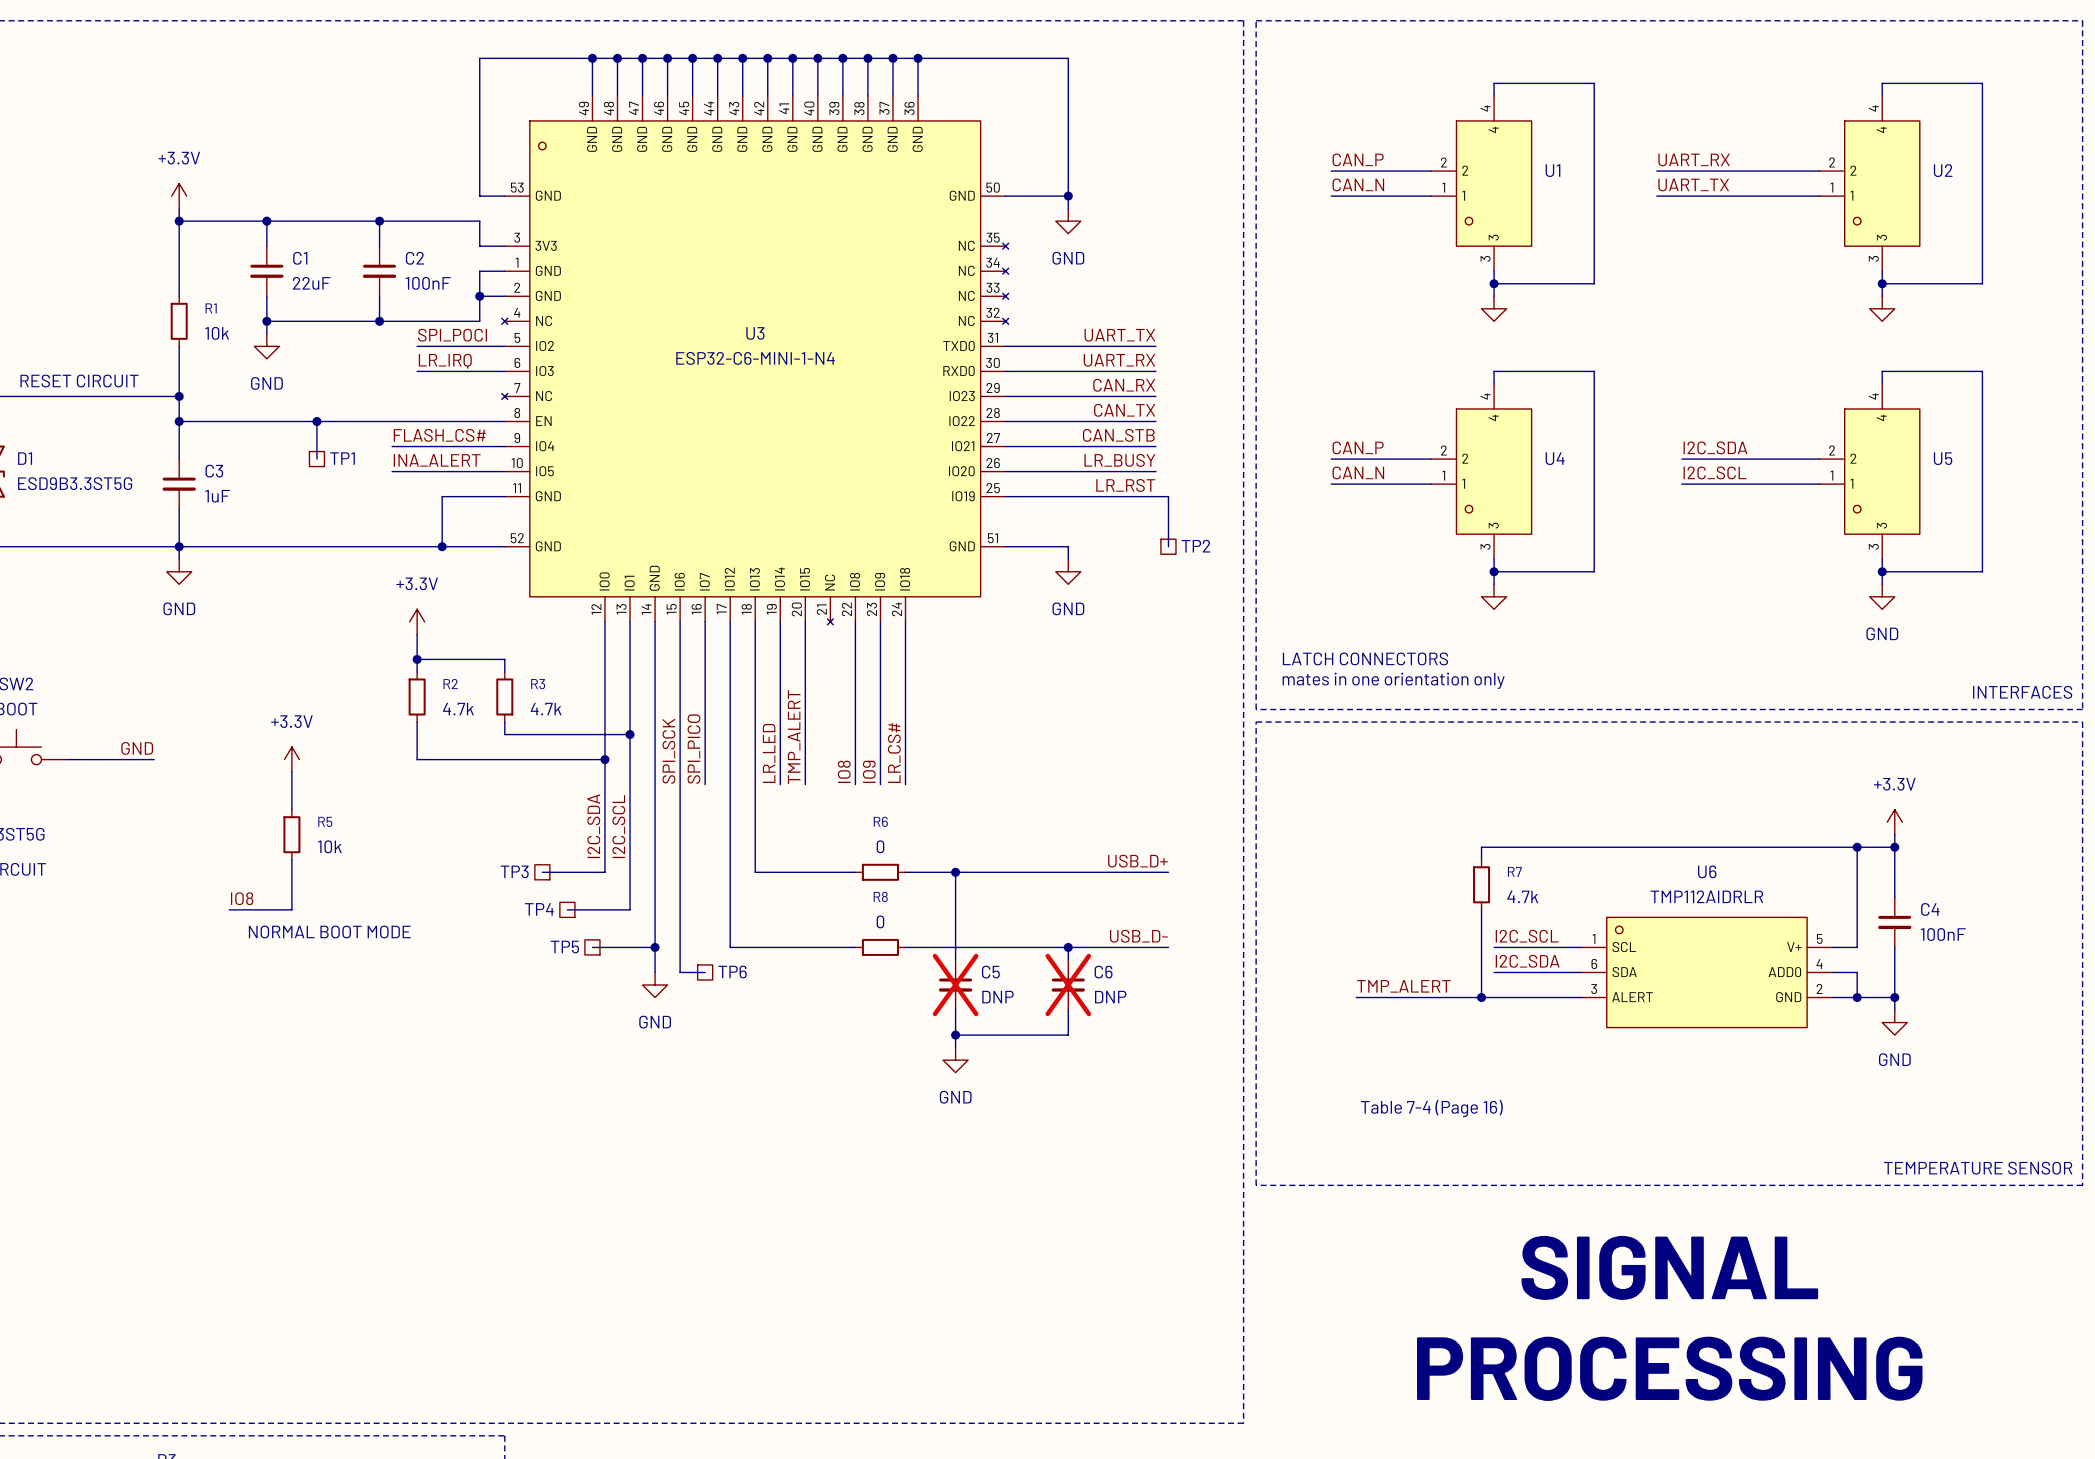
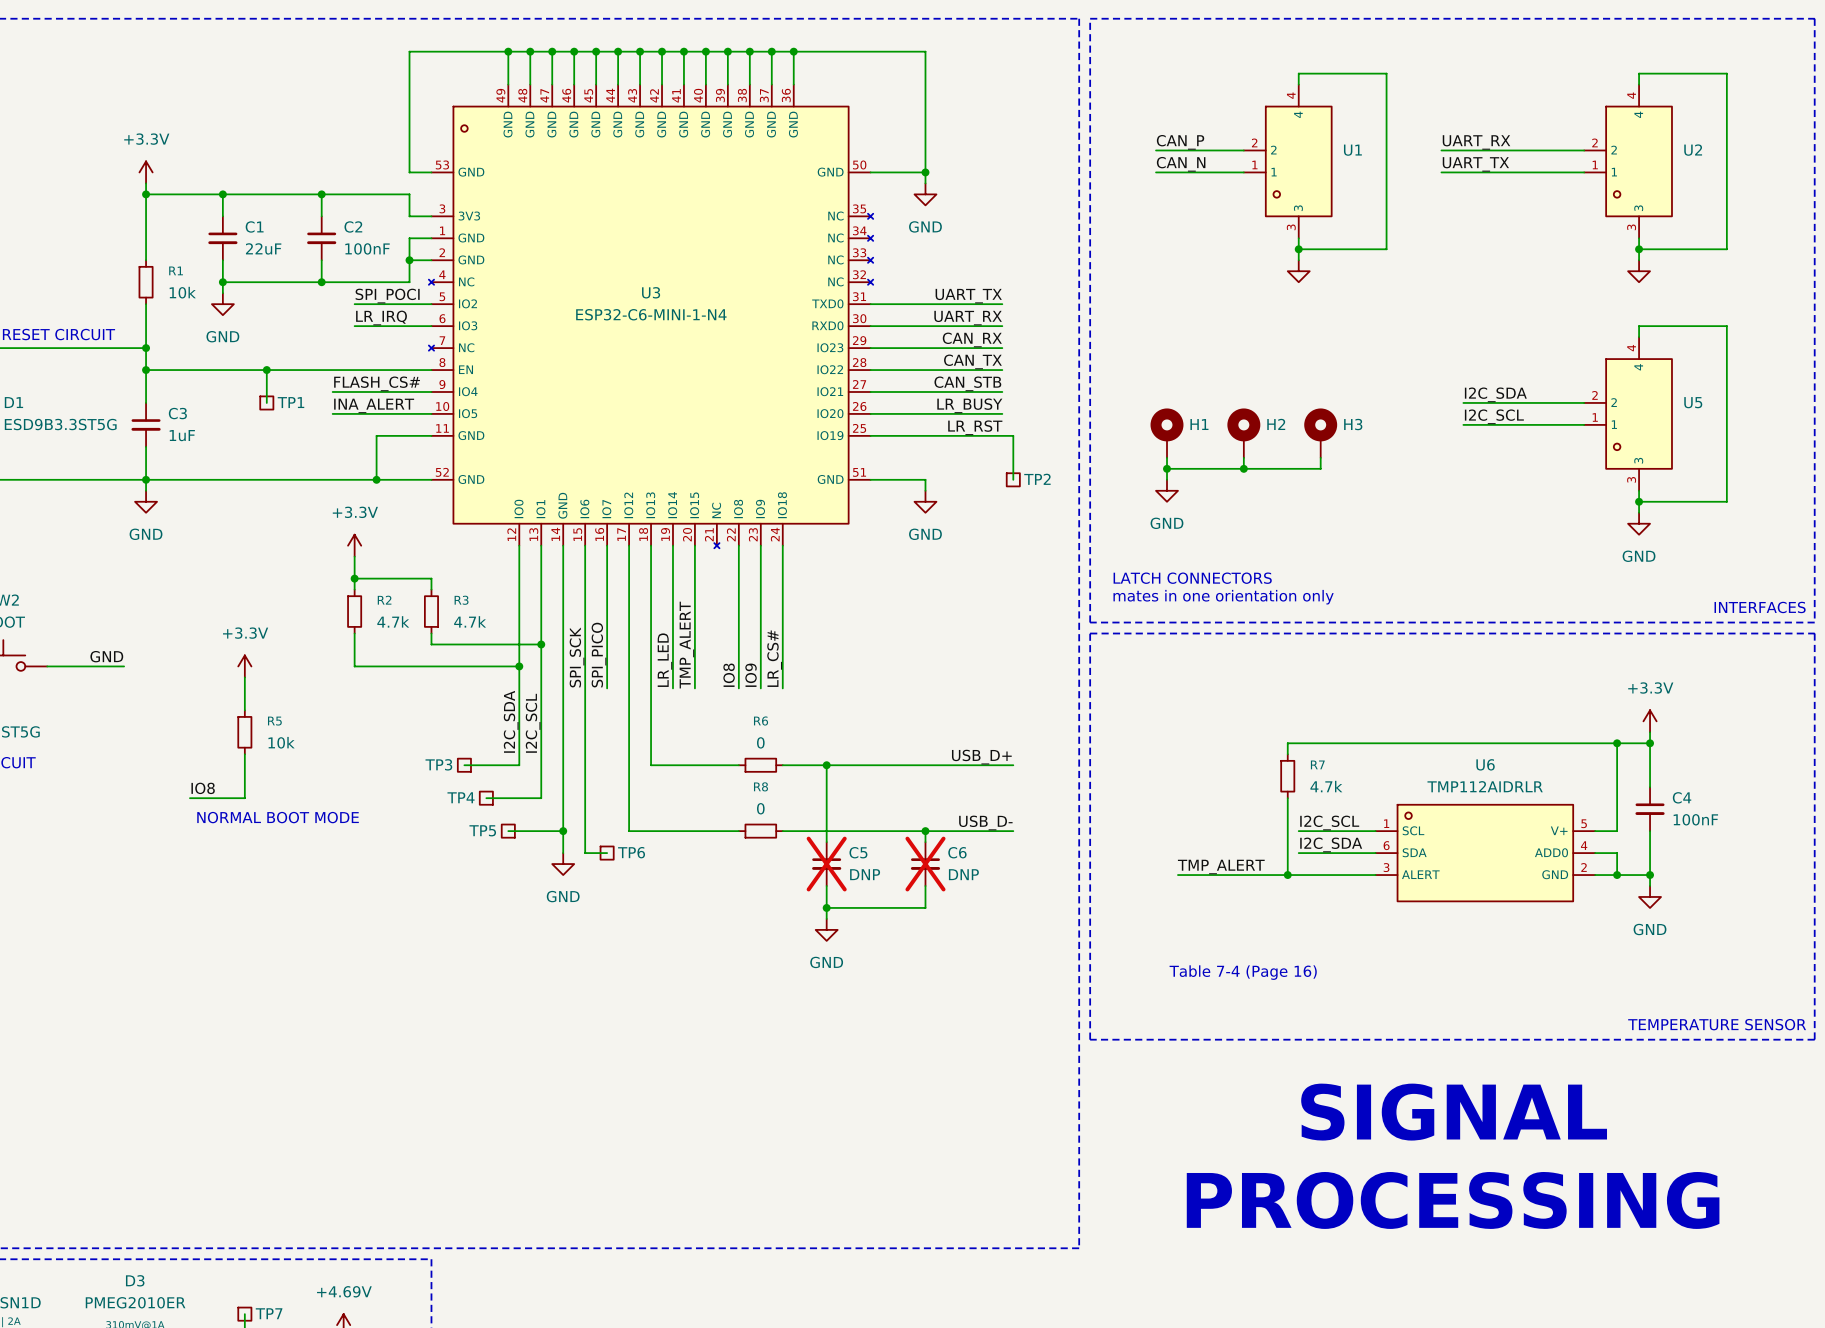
wire: (1494, 383) (1494, 371) (1594, 371) (1594, 571) (1494, 571) -> none
label: CAN_P (1358, 447) -> none
wire: (1331, 459) (1431, 459) -> none
U4: (1481, 471) -> none
label: CAN_N (1358, 472) -> none
wire: (1331, 484) (1431, 484) -> none
H1: none -> (1167, 433)
H2: none -> (1243, 433)
H3: none -> (1320, 433)
wire: none -> (1243, 457) (1243, 468)
wire: none -> (1320, 457) (1320, 468) (1167, 468)
junction: none -> (1167, 468)
junction: none -> (1243, 468)
power symbol: none -> GND (1167, 490)
wire: (1494, 559) (1494, 584) -> (1167, 457) (1167, 479)
junction: (1494, 571) -> none
power symbol: (1494, 596) -> none

